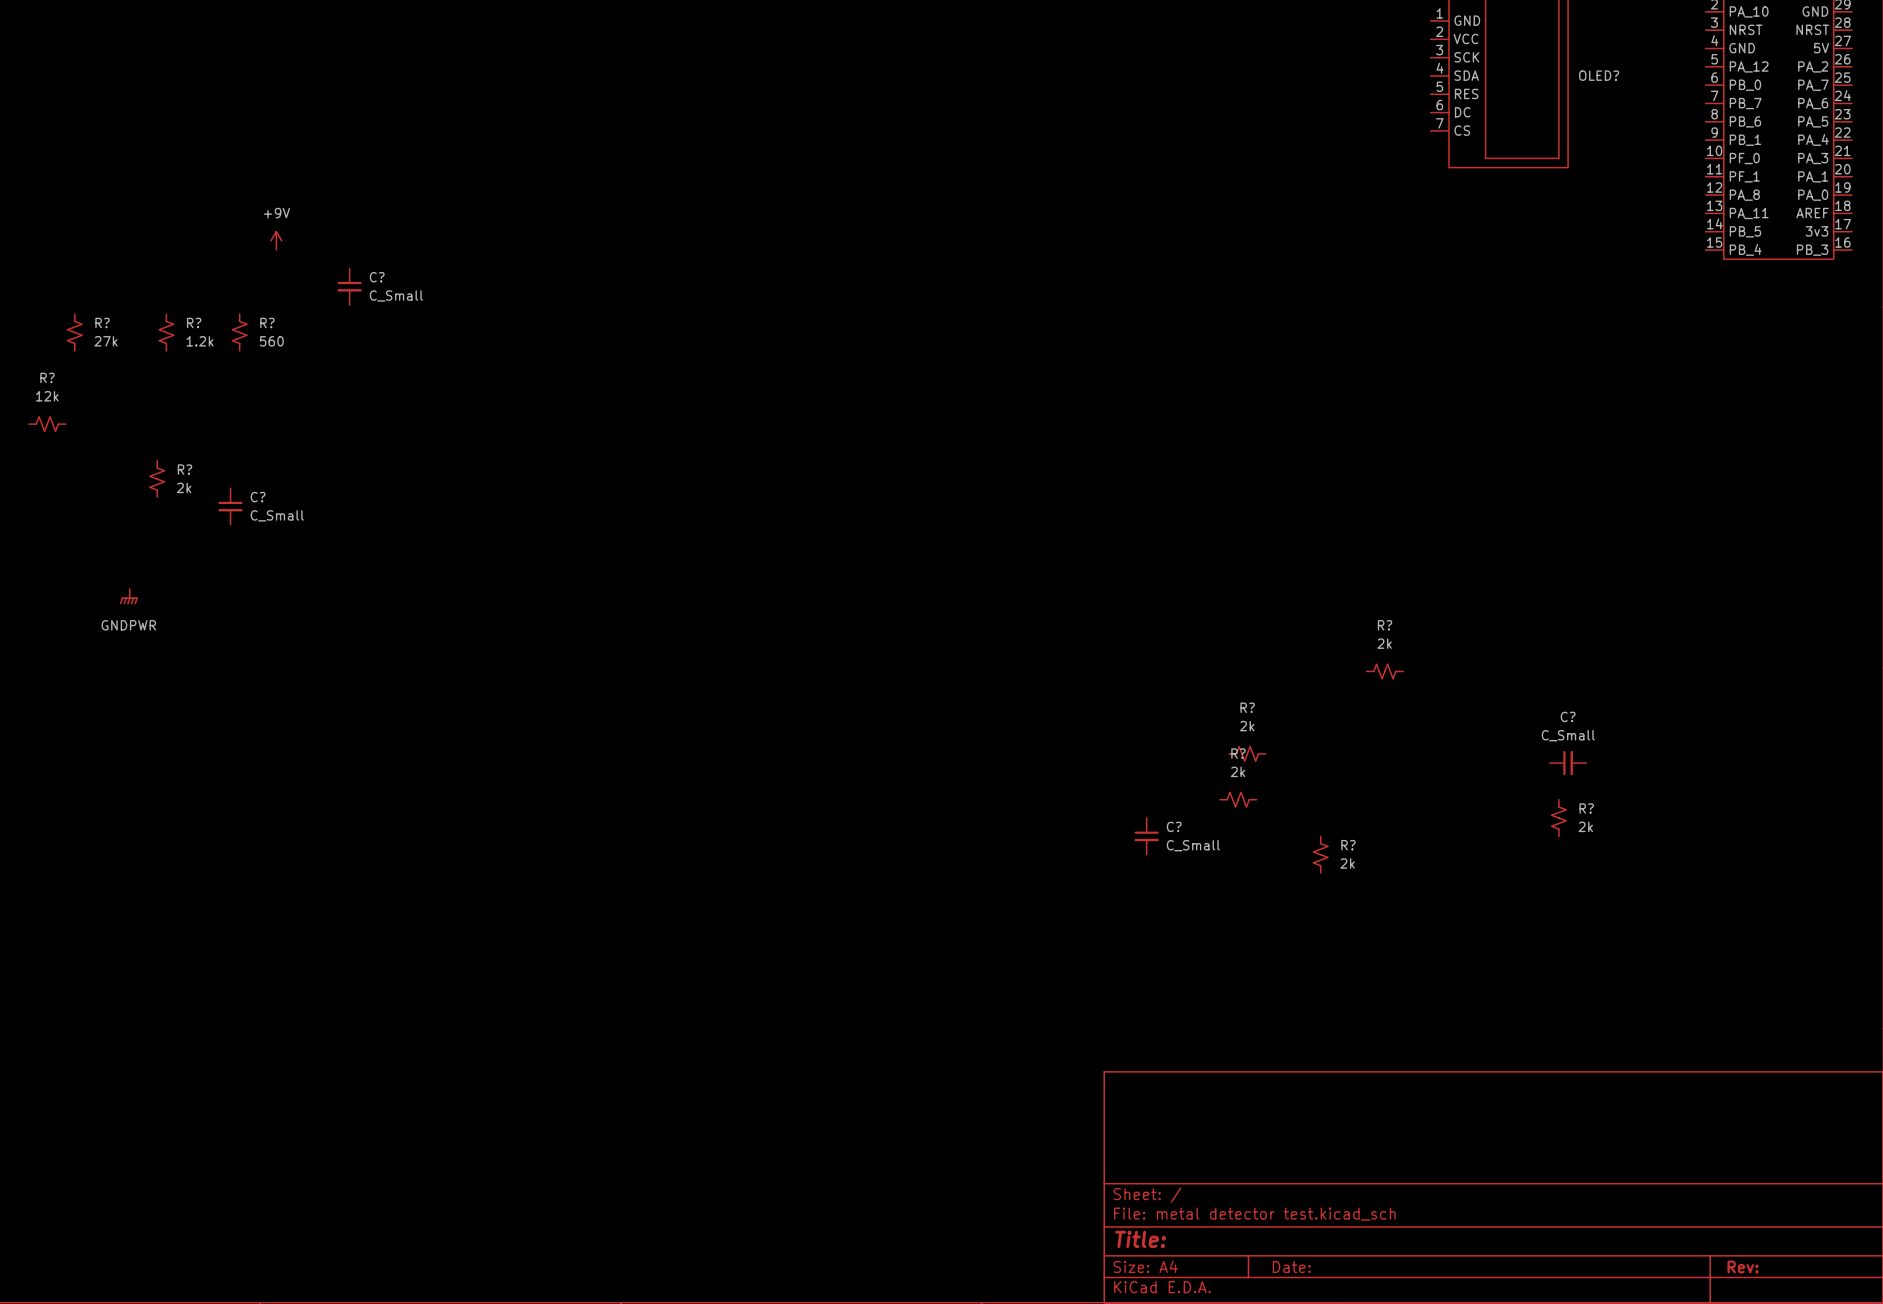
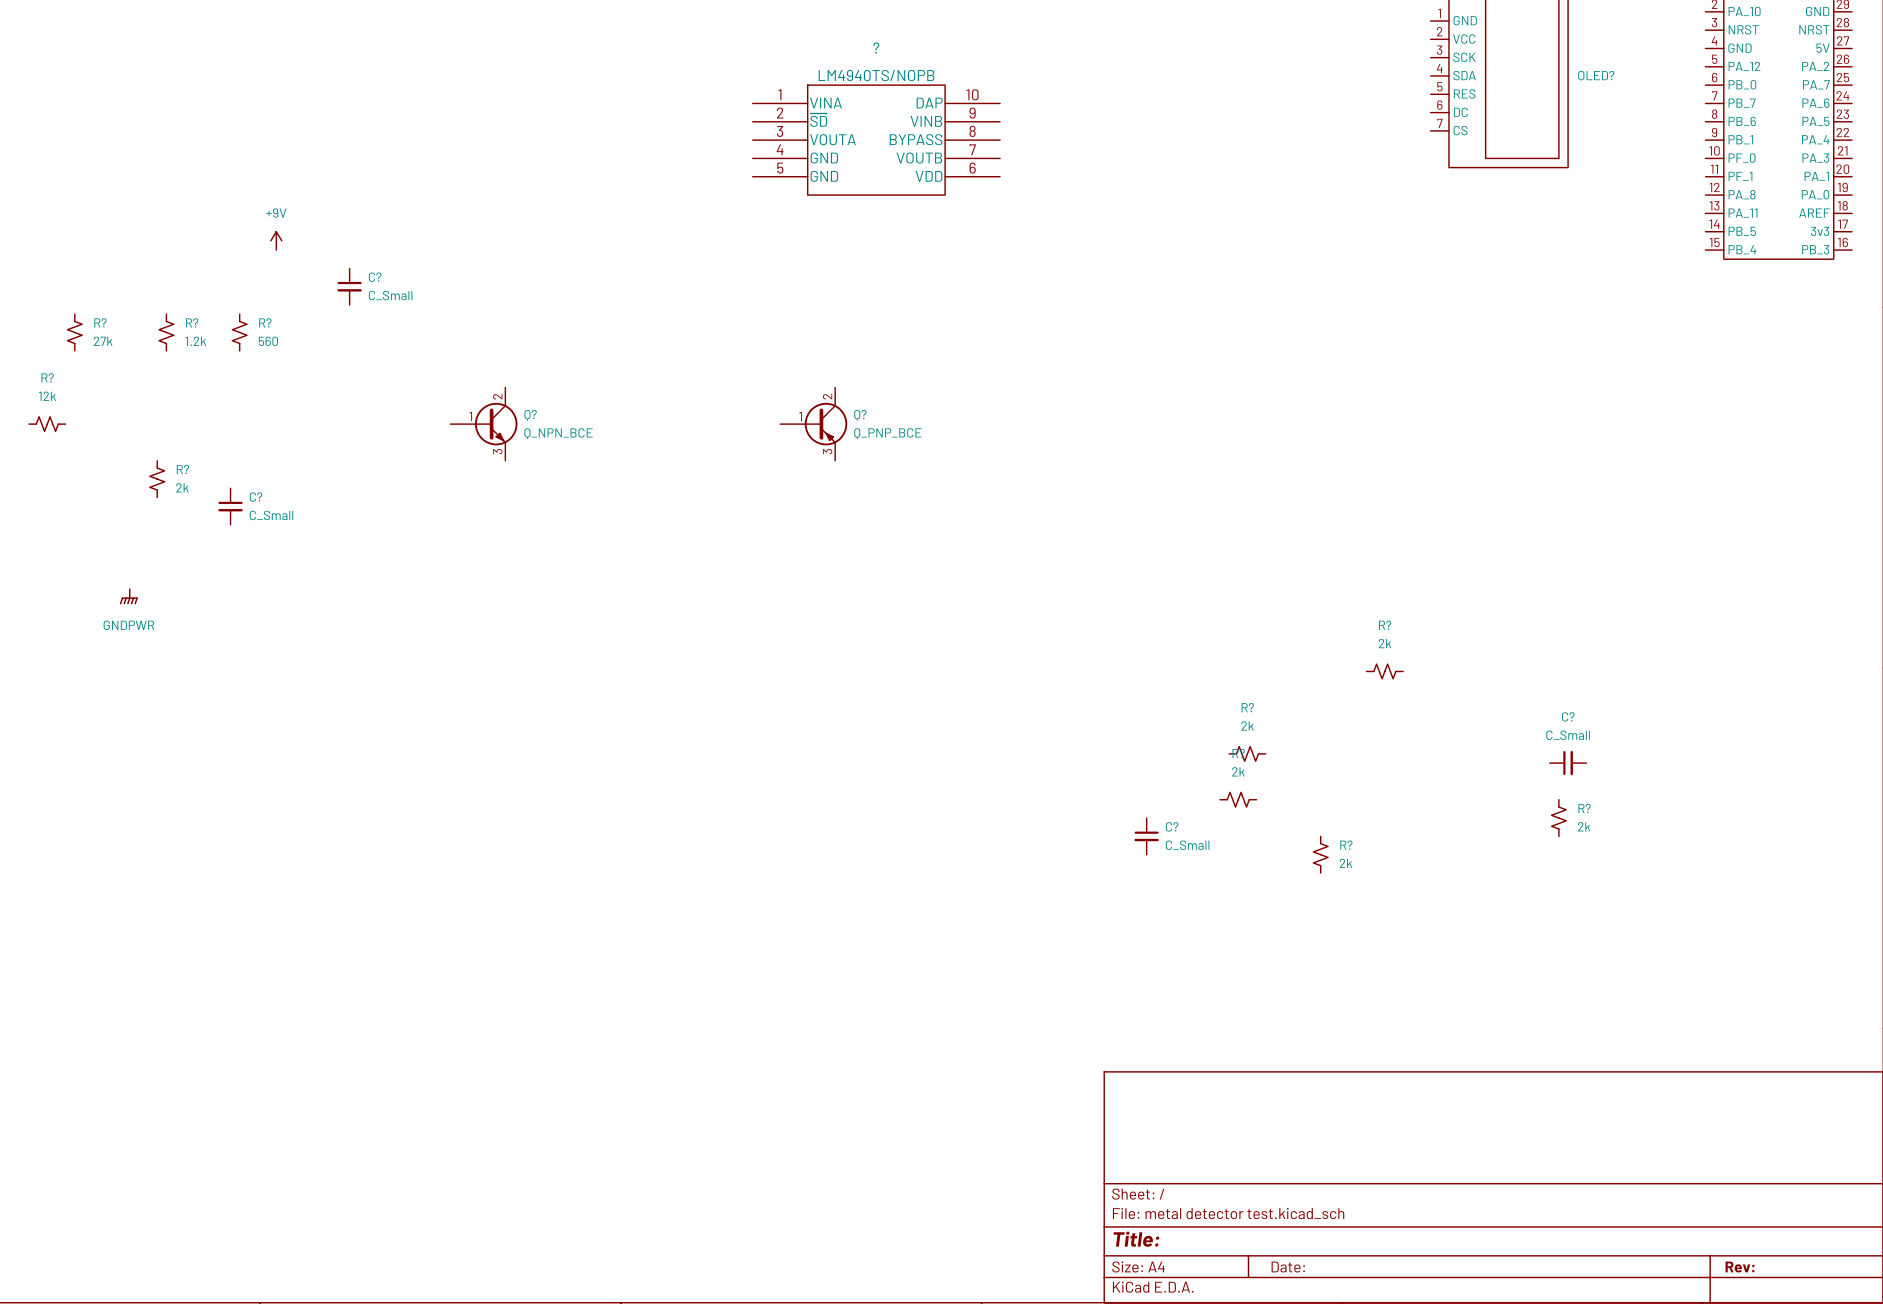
part: none -> LM4940TS/NOPB (876, 140)
Q?: none -> Q_NPN_BCE (483, 424)
Q?: none -> Q_PNP_BCE (813, 424)

